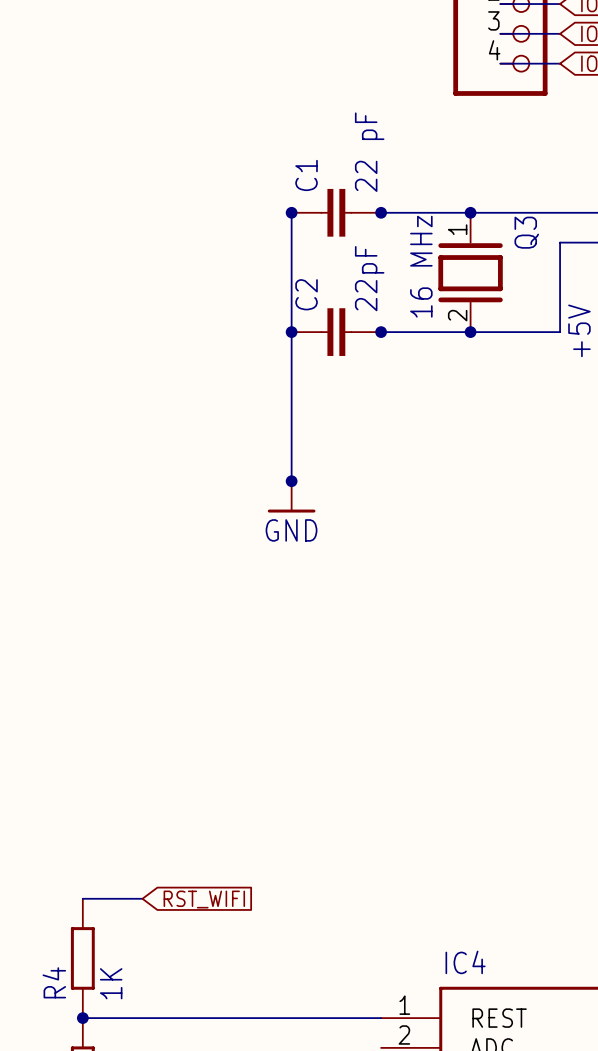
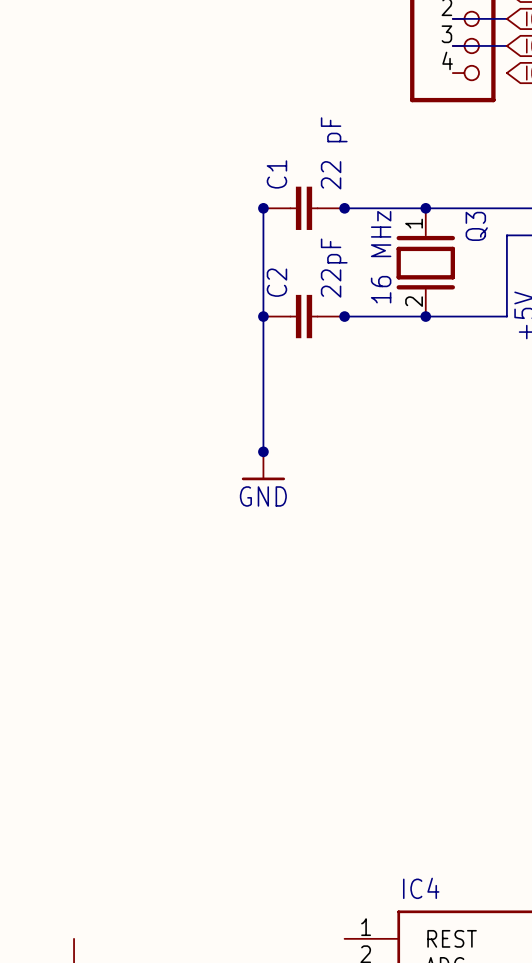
wire: (500, 63) (560, 63) -> none
wire: (82, 898) (142, 898) -> none
global label: RST_WIFI (204, 899) -> none
R4: 1K (82, 958) -> none
wire: (82, 1018) (381, 1018) -> none
junction: (82, 1018) -> none

